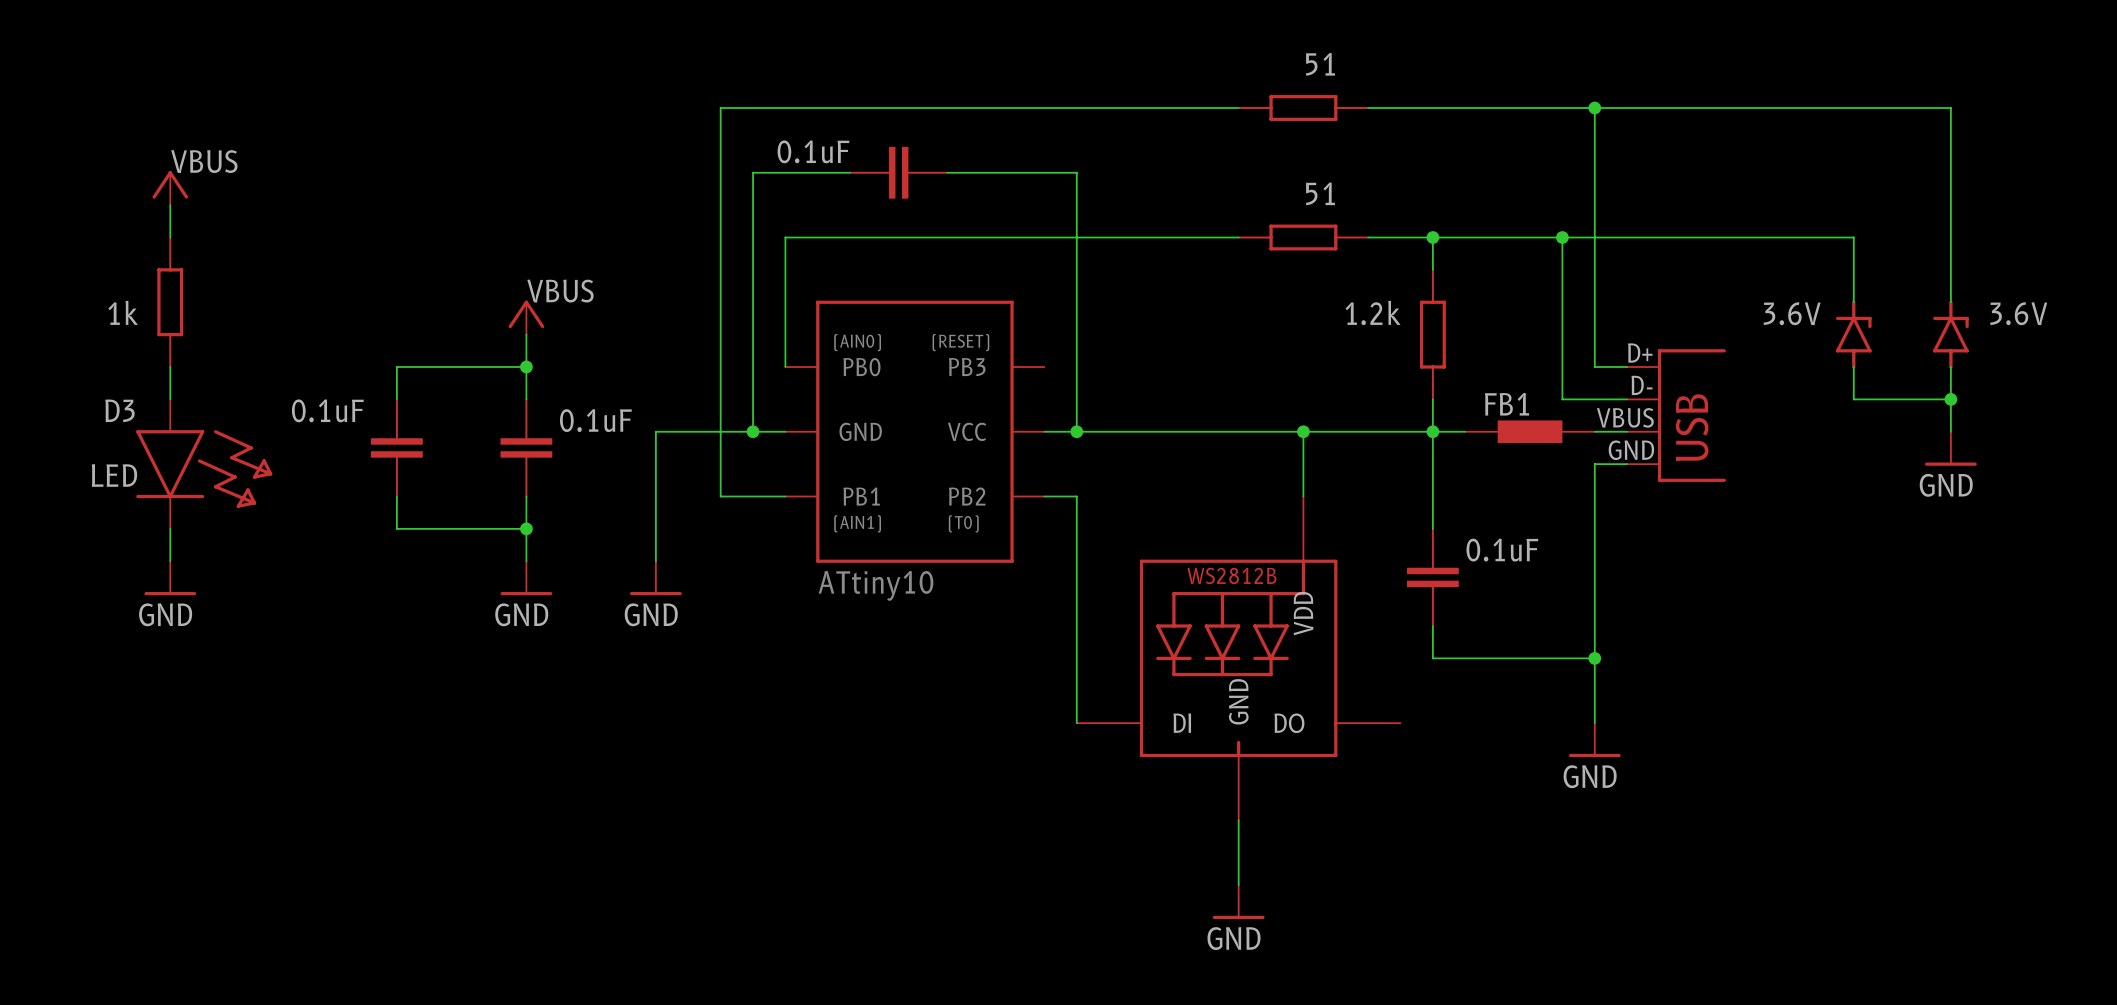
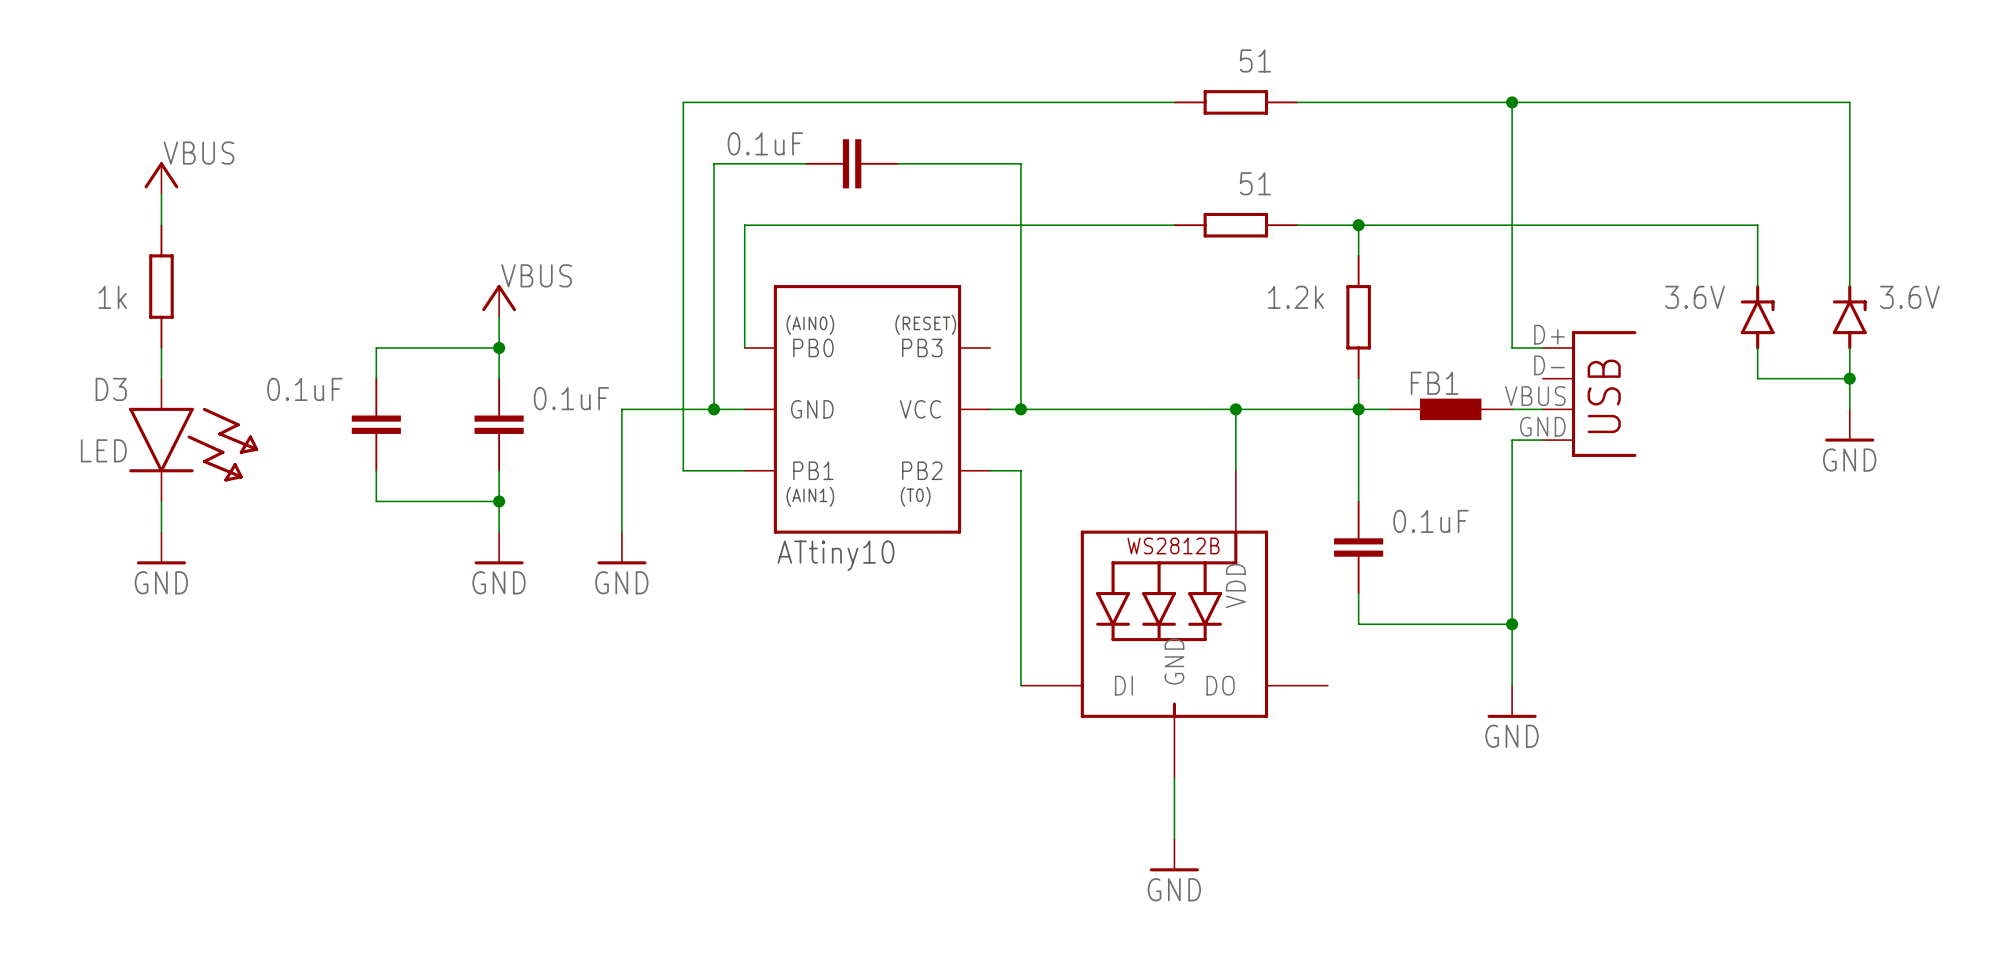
wire: (1562, 237) (1562, 399) (1627, 399) -> none
junction: (1562, 237) -> none

